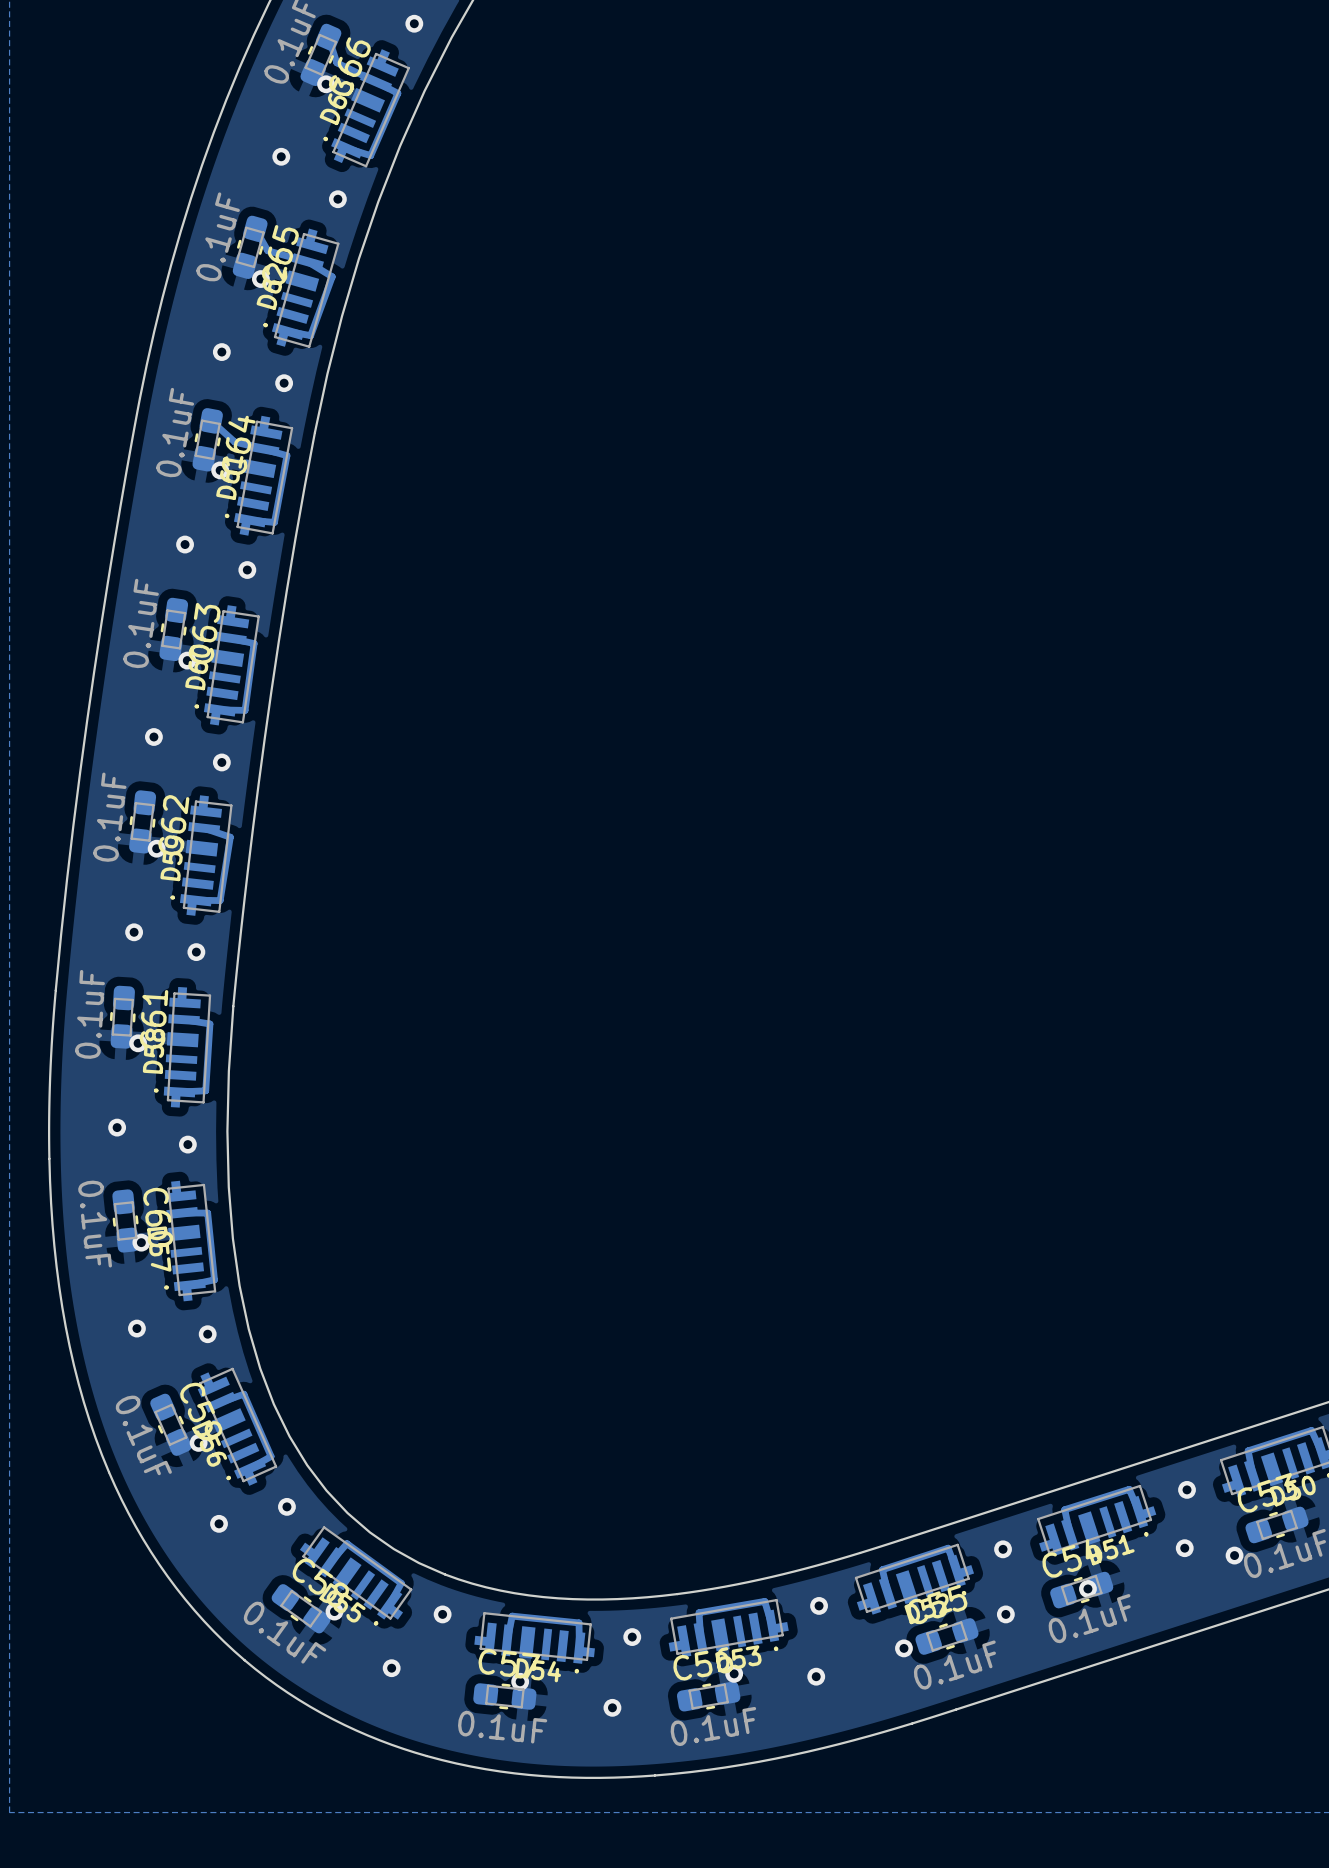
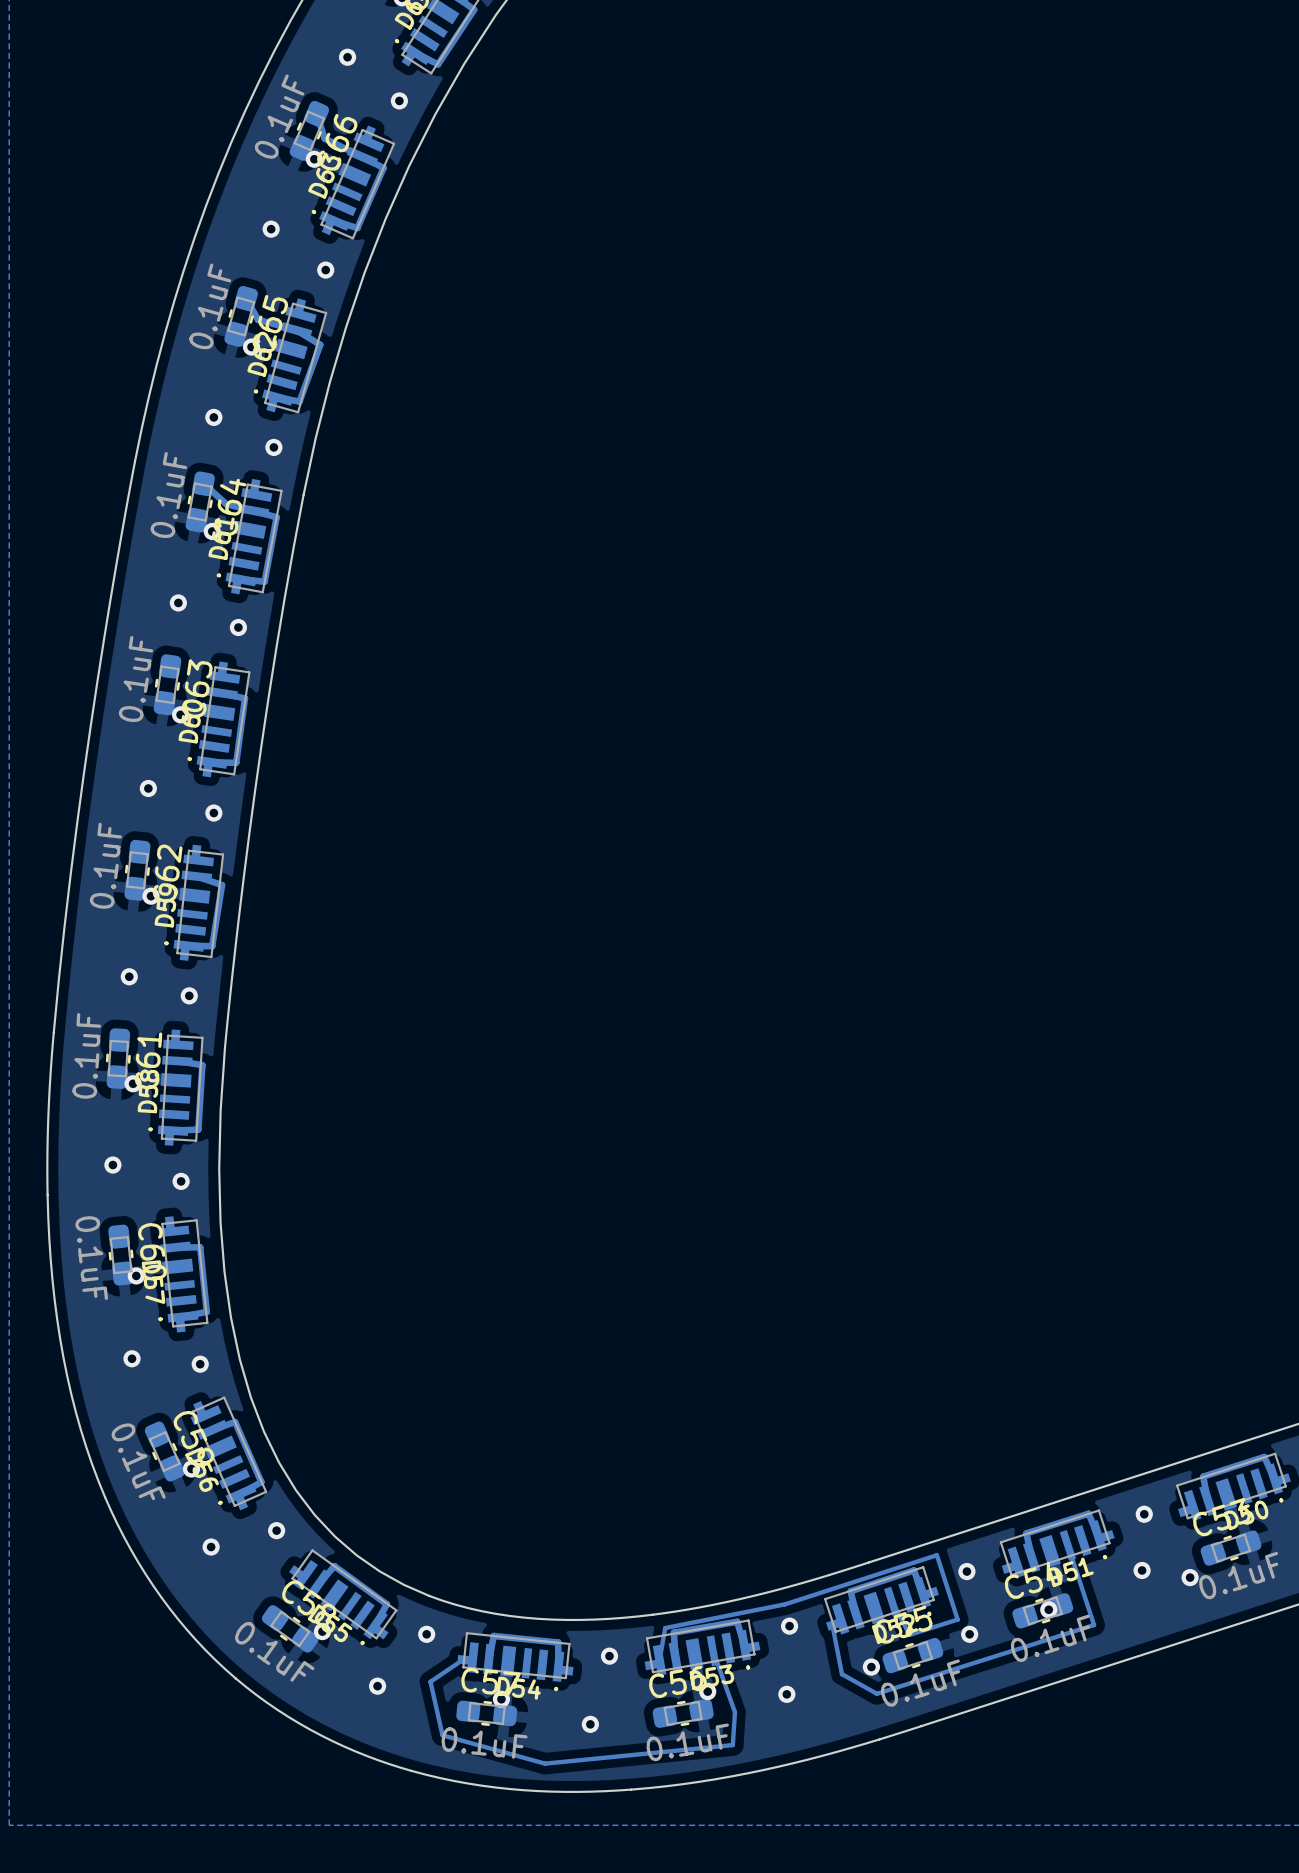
track: none -> (1067, 1545) (1094, 1625) (876, 1693) (841, 1674) (832, 1625)
track: none -> (892, 1602) (909, 1634) (957, 1619) (936, 1555) (785, 1604) (665, 1628) (659, 1660)
track: none -> (713, 1650) (735, 1712) (732, 1745) (545, 1763) (442, 1735) (430, 1681) (463, 1659)

